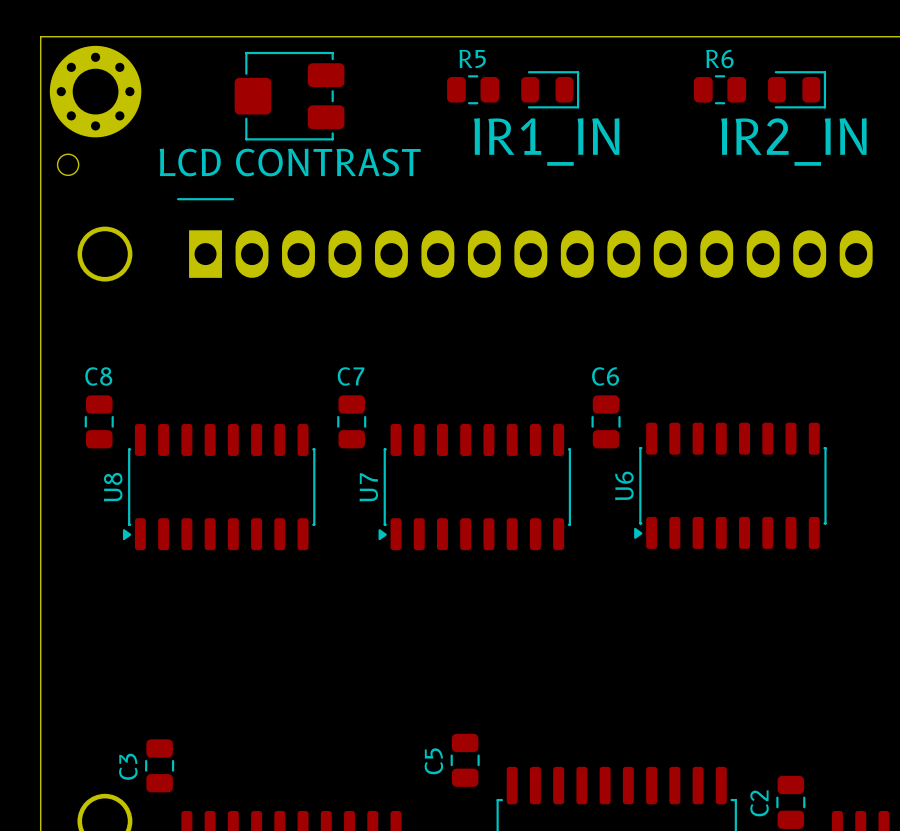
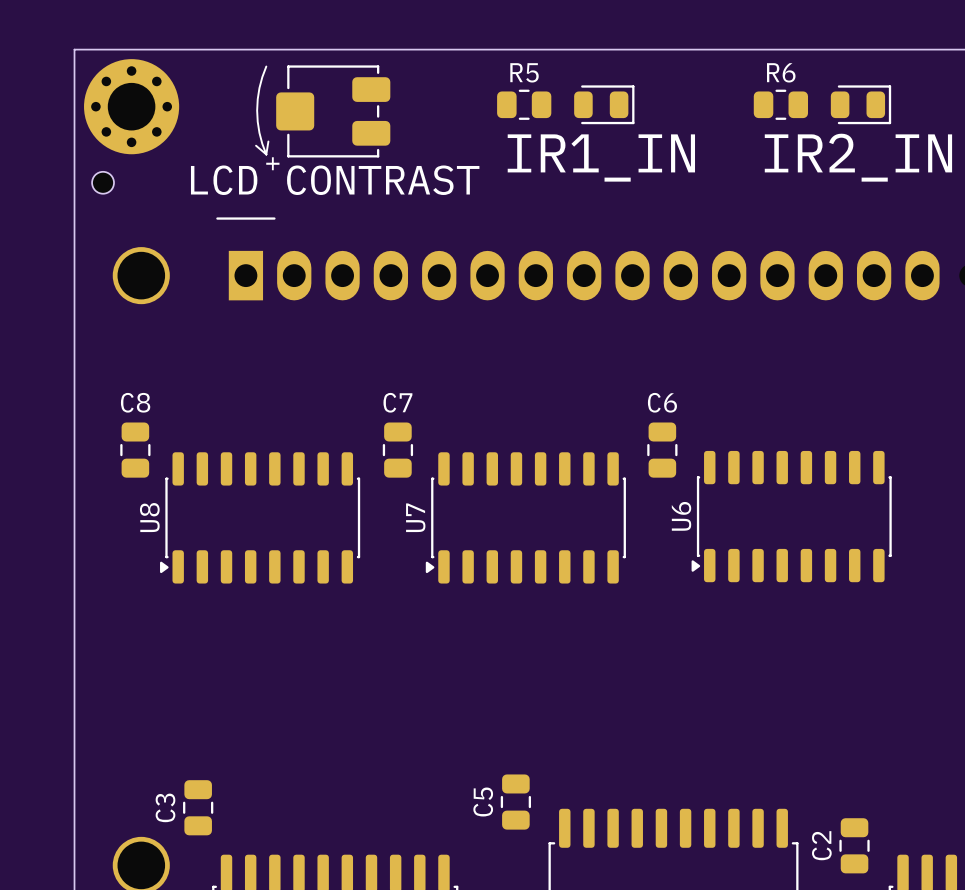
line: none -> (266, 66) (259, 88) (257, 110) (259, 132) (266, 154)
line: none -> (268, 141) (266, 154)
line: none -> (256, 145) (266, 154)
text: none -> + (272, 163)

